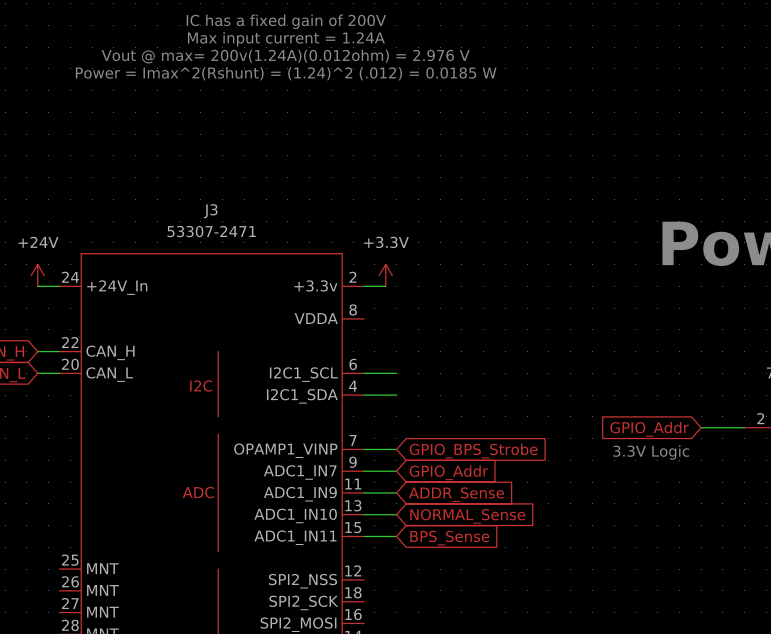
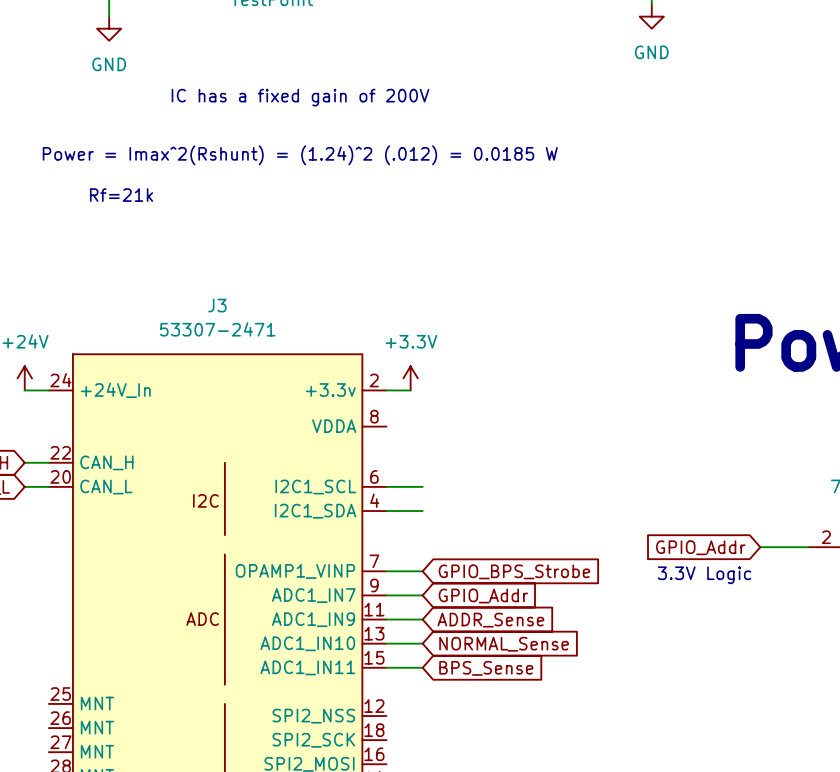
text: Max input current = 1.24A (286, 39) -> none
text: Vout @ max= 200v(1.24A)(0.012ohm) = 2.976 V (285, 56) -> none
text: none -> Rf=21k (121, 195)

